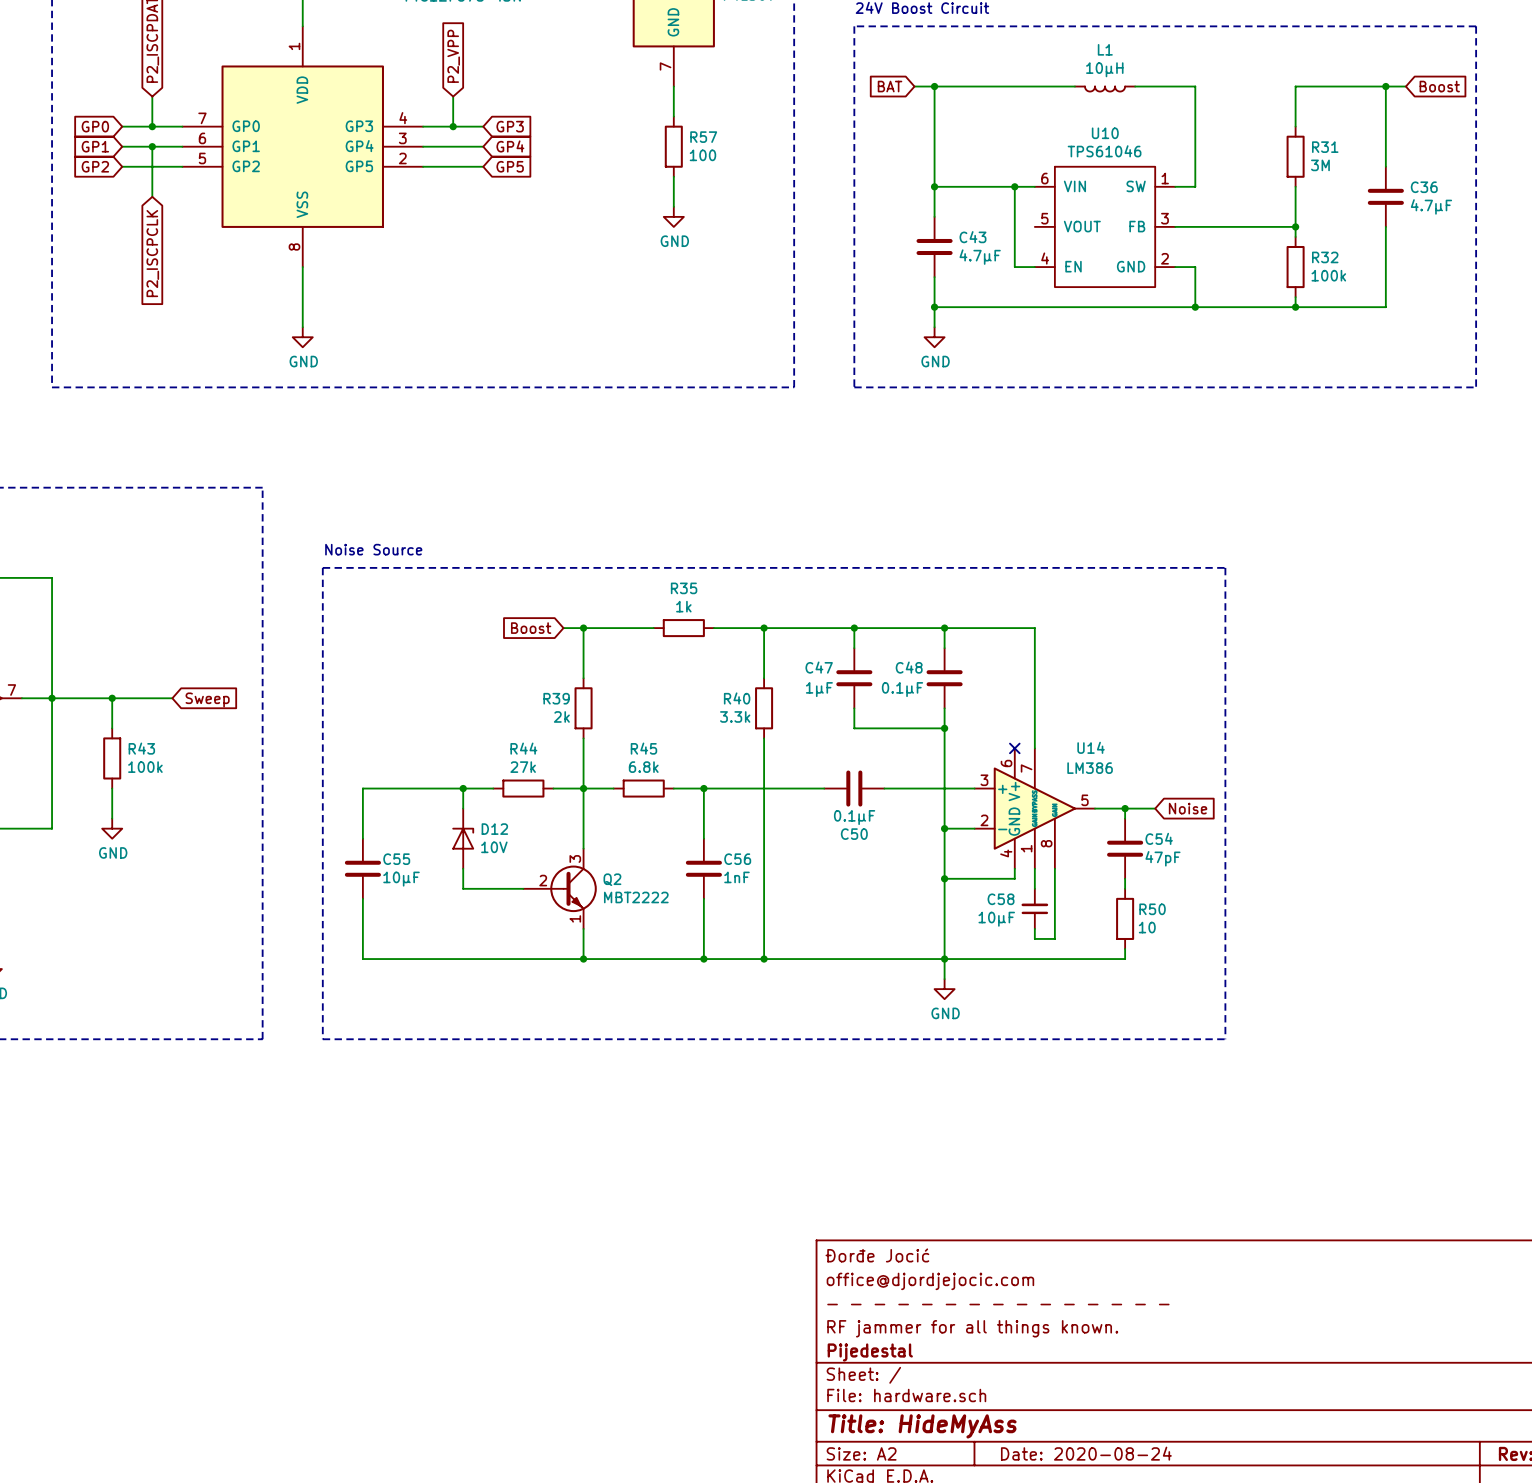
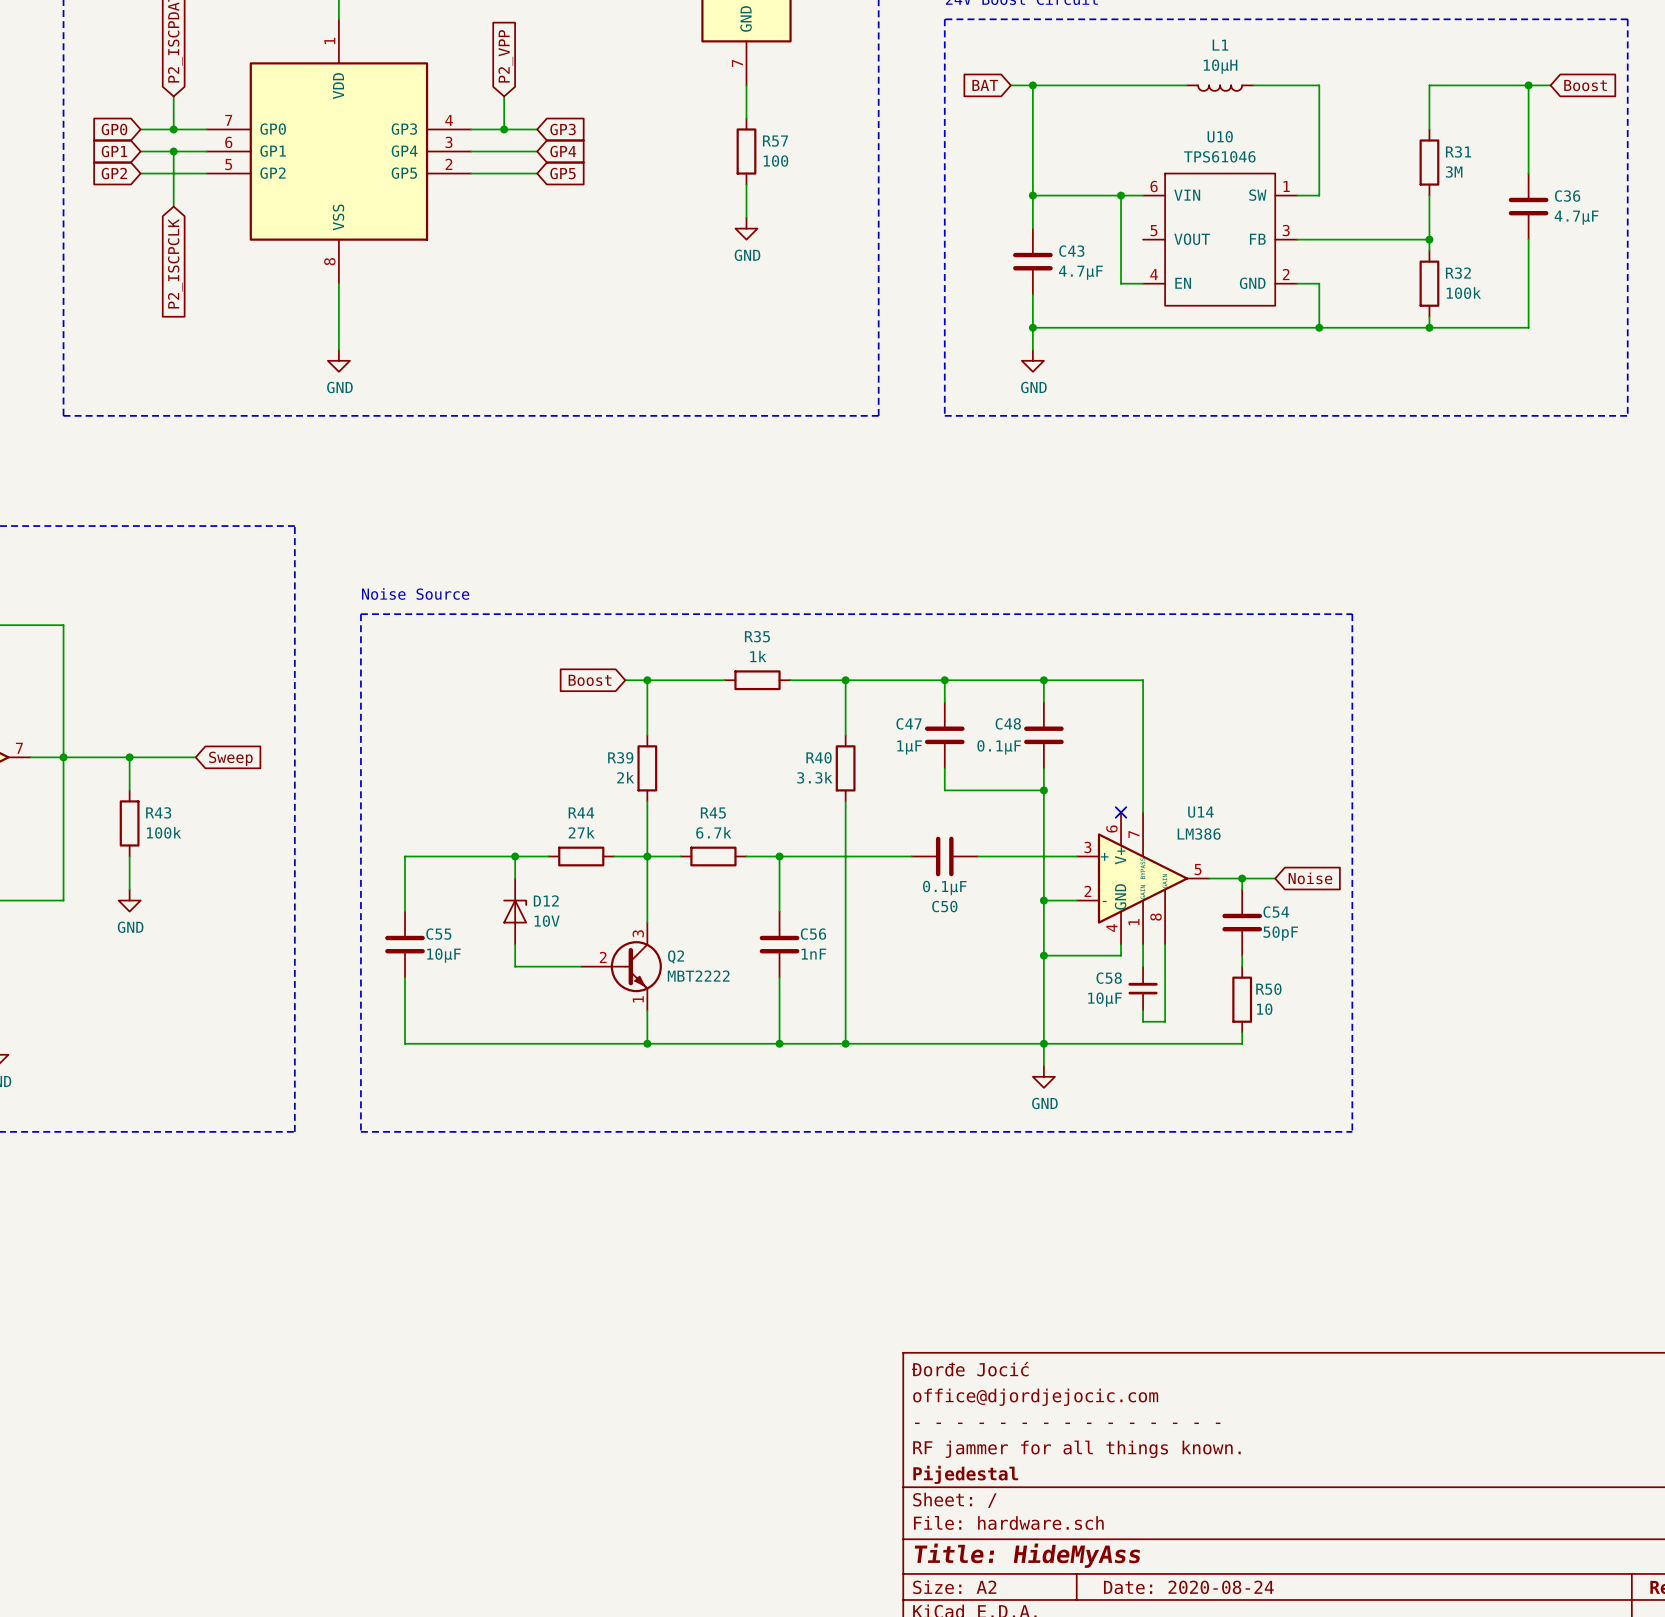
R45 value: 6.8k (643, 767) -> 6.7k (713, 832)
C54 value: 47pF (1162, 858) -> 50pF (1280, 933)

